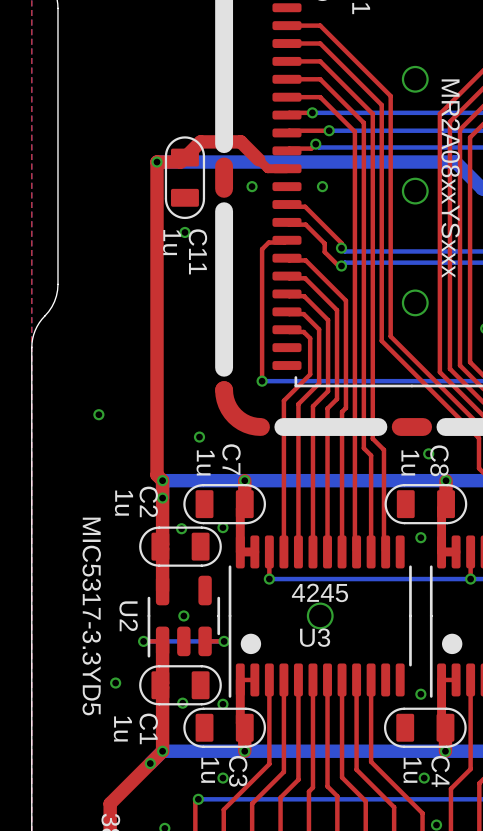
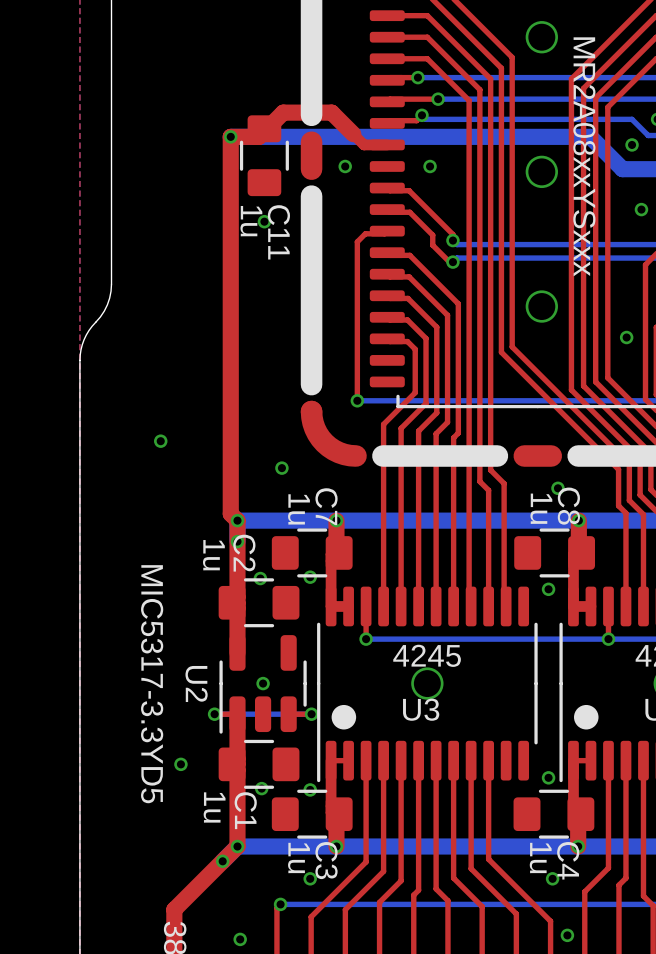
C11 footprint: [164, 136, 206, 220] -> [239, 115, 289, 197]
C7 footprint: [183, 484, 267, 525] -> [271, 528, 353, 578]
C8 footprint: [384, 484, 468, 525] -> [514, 528, 596, 578]
C2 footprint: [139, 526, 222, 567] -> [218, 578, 300, 628]
C1 footprint: [139, 665, 222, 706] -> [218, 739, 300, 789]
C3 footprint: [183, 707, 267, 748] -> [271, 789, 353, 839]
C4 footprint: [383, 707, 467, 748] -> [513, 789, 595, 839]

